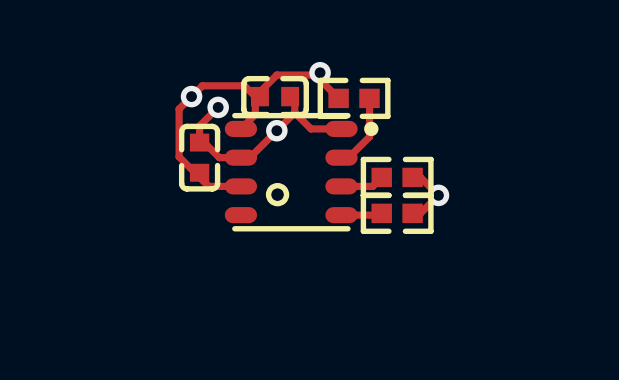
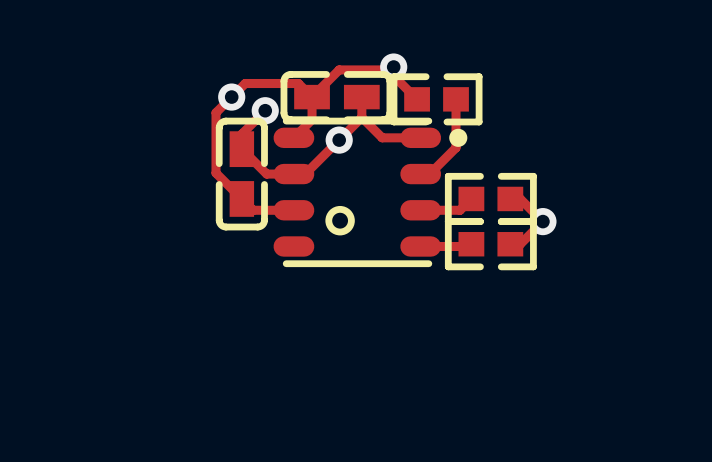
part footprint: [241, 75, 309, 118] -> [280, 71, 394, 124]
part footprint: [178, 123, 221, 192] -> [215, 117, 268, 231]

